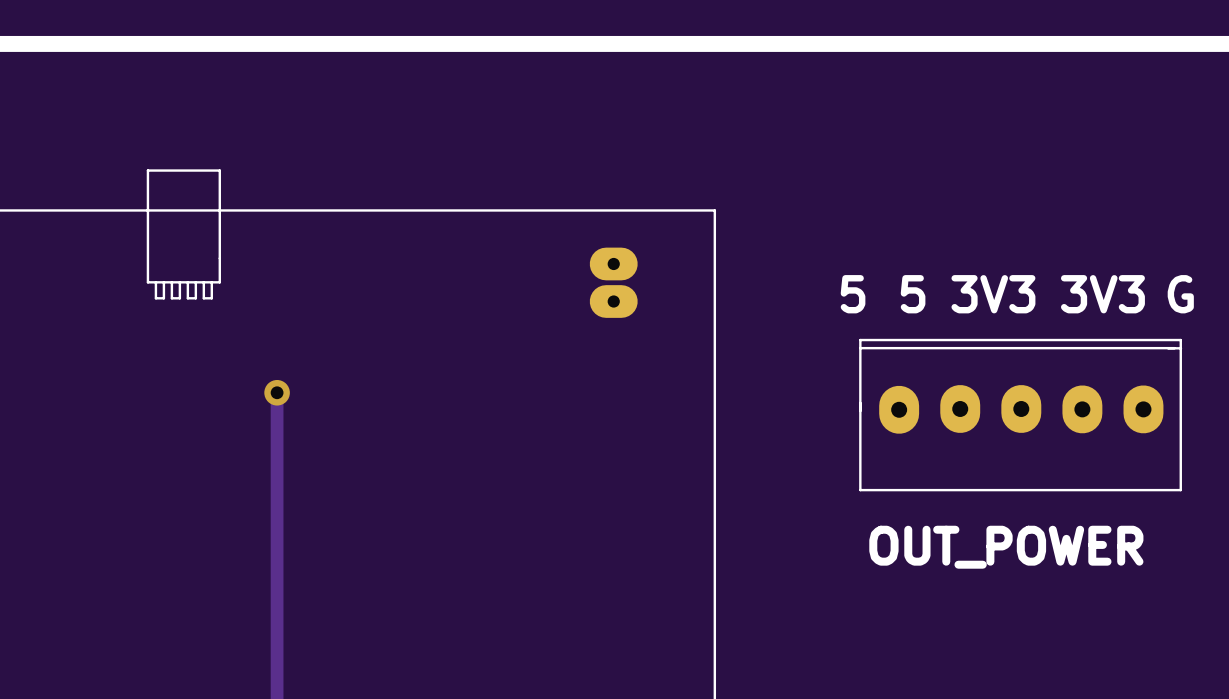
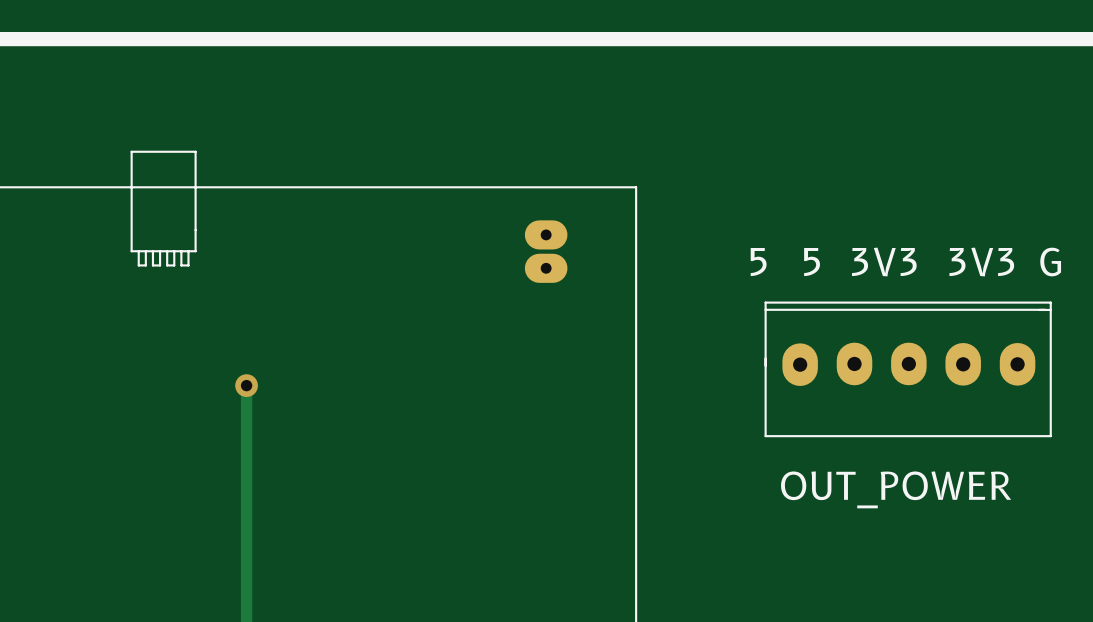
track: (277, 392) (277, 433) -> none
via position: (277, 392) -> (246, 385)

